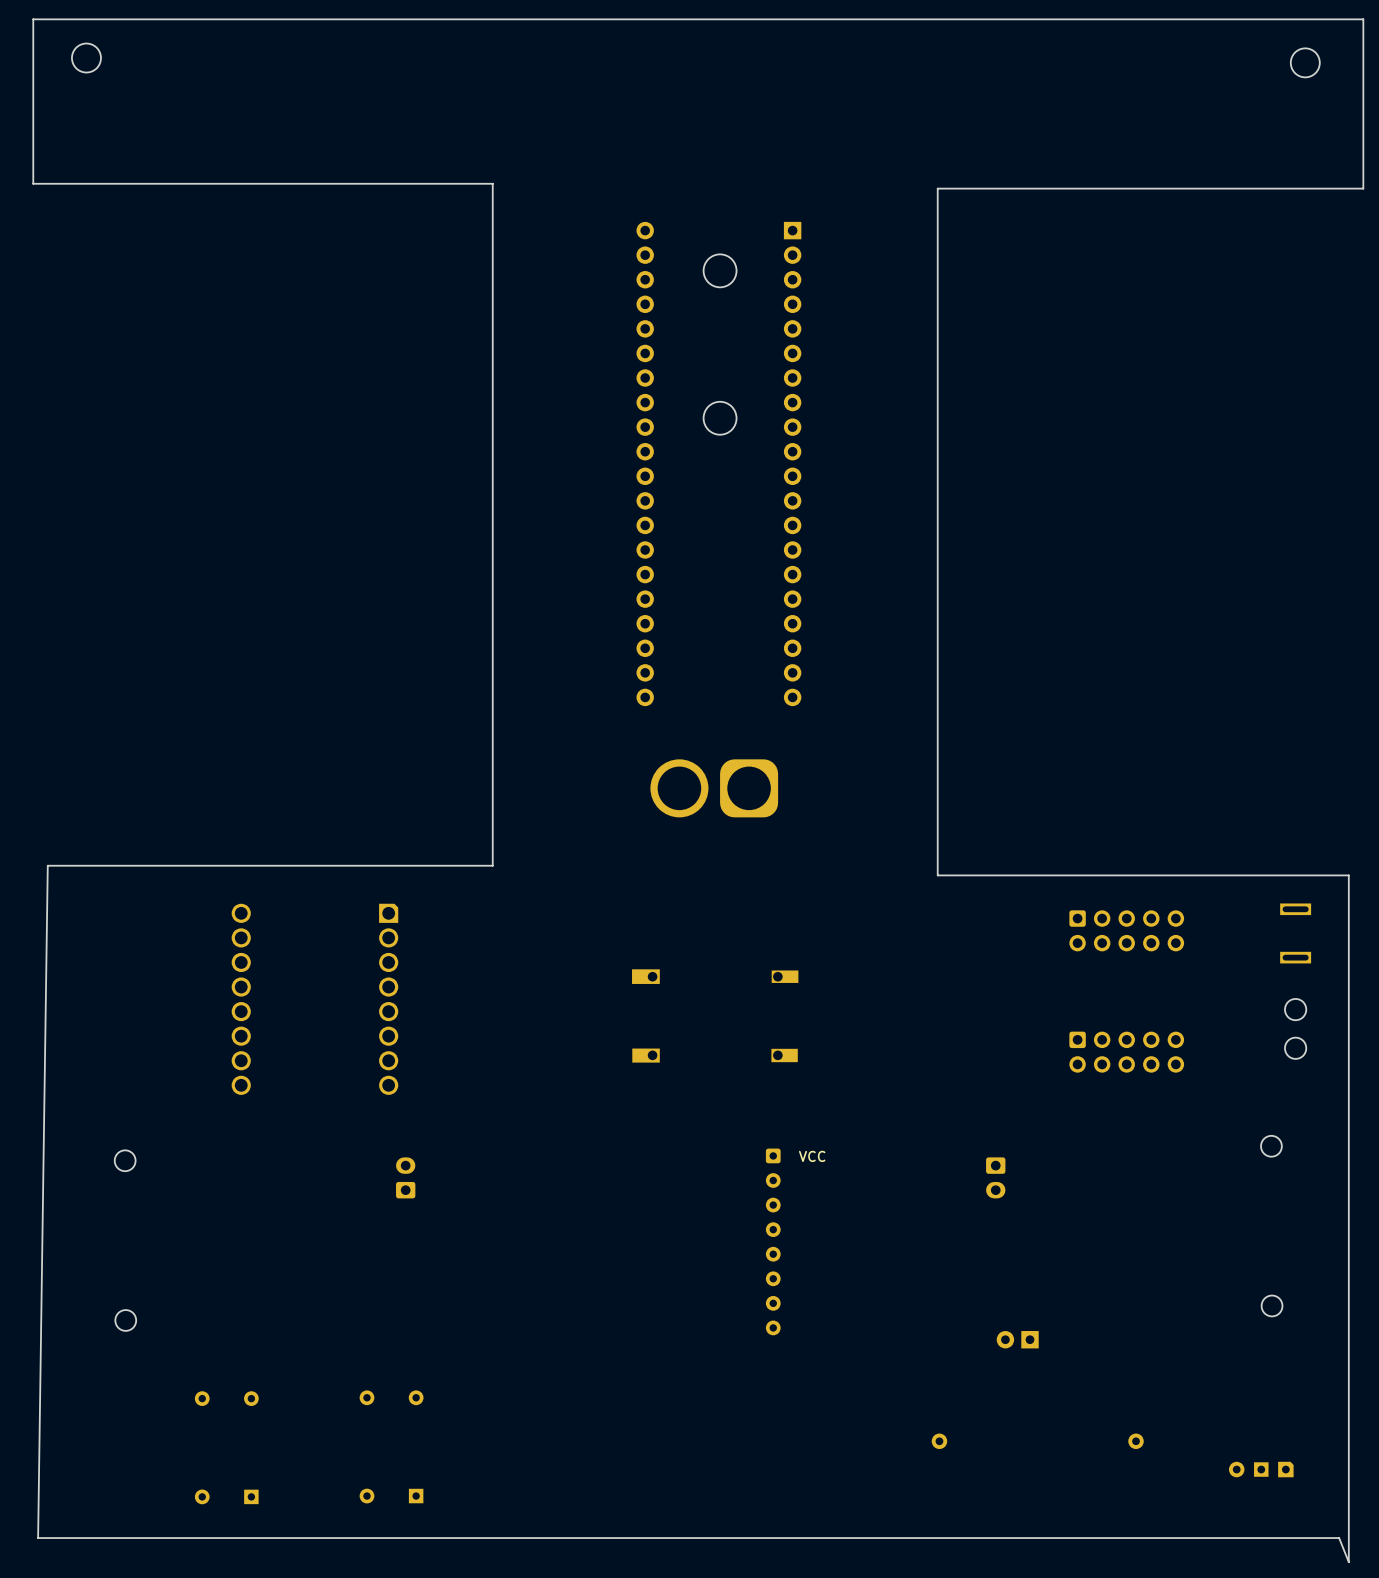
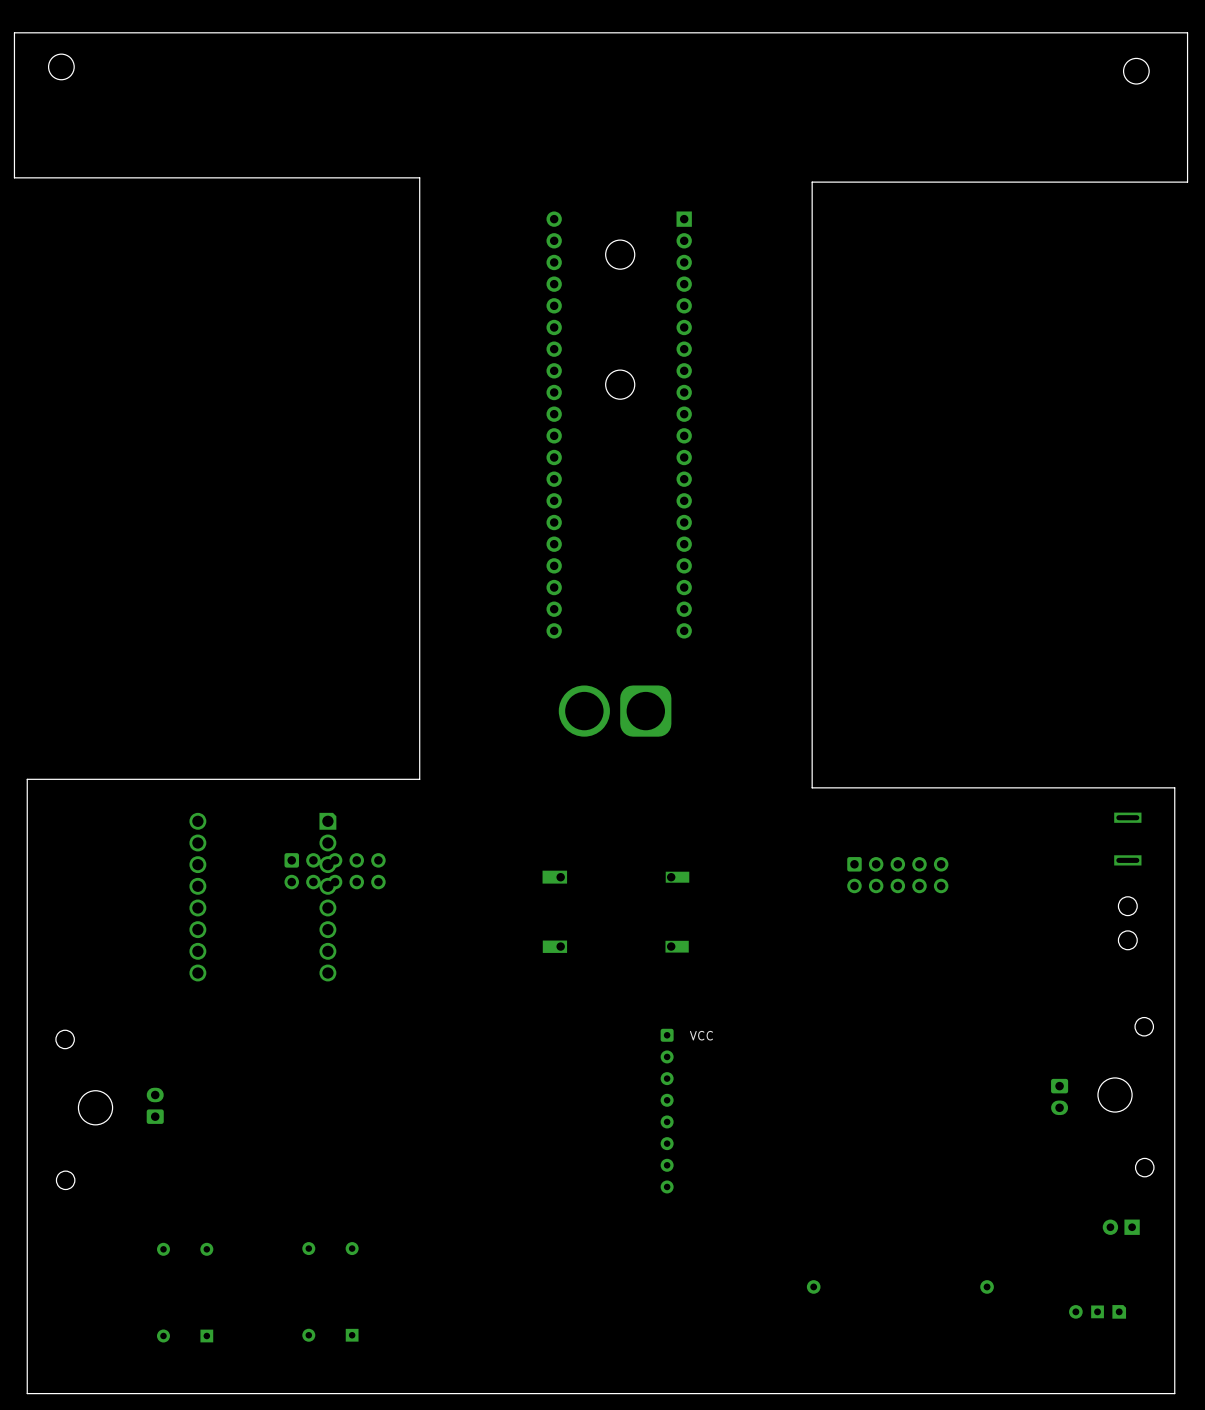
board edge: (47, 865) (38, 1538) (1339, 1538) (1348, 1562) -> (27, 779) (27, 1393) (1174, 1393)
part: (1126, 930) -> none
part: none -> (335, 871)
part: none -> (897, 875)
part: (1126, 1052) -> none
round board edge position: (1271, 1146) -> (1144, 1026)
round board edge position: (125, 1160) -> (65, 1039)
part position: (405, 1177) -> (155, 1105)
part position: (995, 1177) -> (1059, 1096)
round board edge: none -> [1097, 1077, 1133, 1113]
round board edge: none -> [78, 1090, 113, 1126]
round board edge position: (1272, 1305) -> (1144, 1167)
round board edge position: (125, 1320) -> (65, 1180)
part: (1017, 1339) -> none
part: none -> (1121, 1227)

